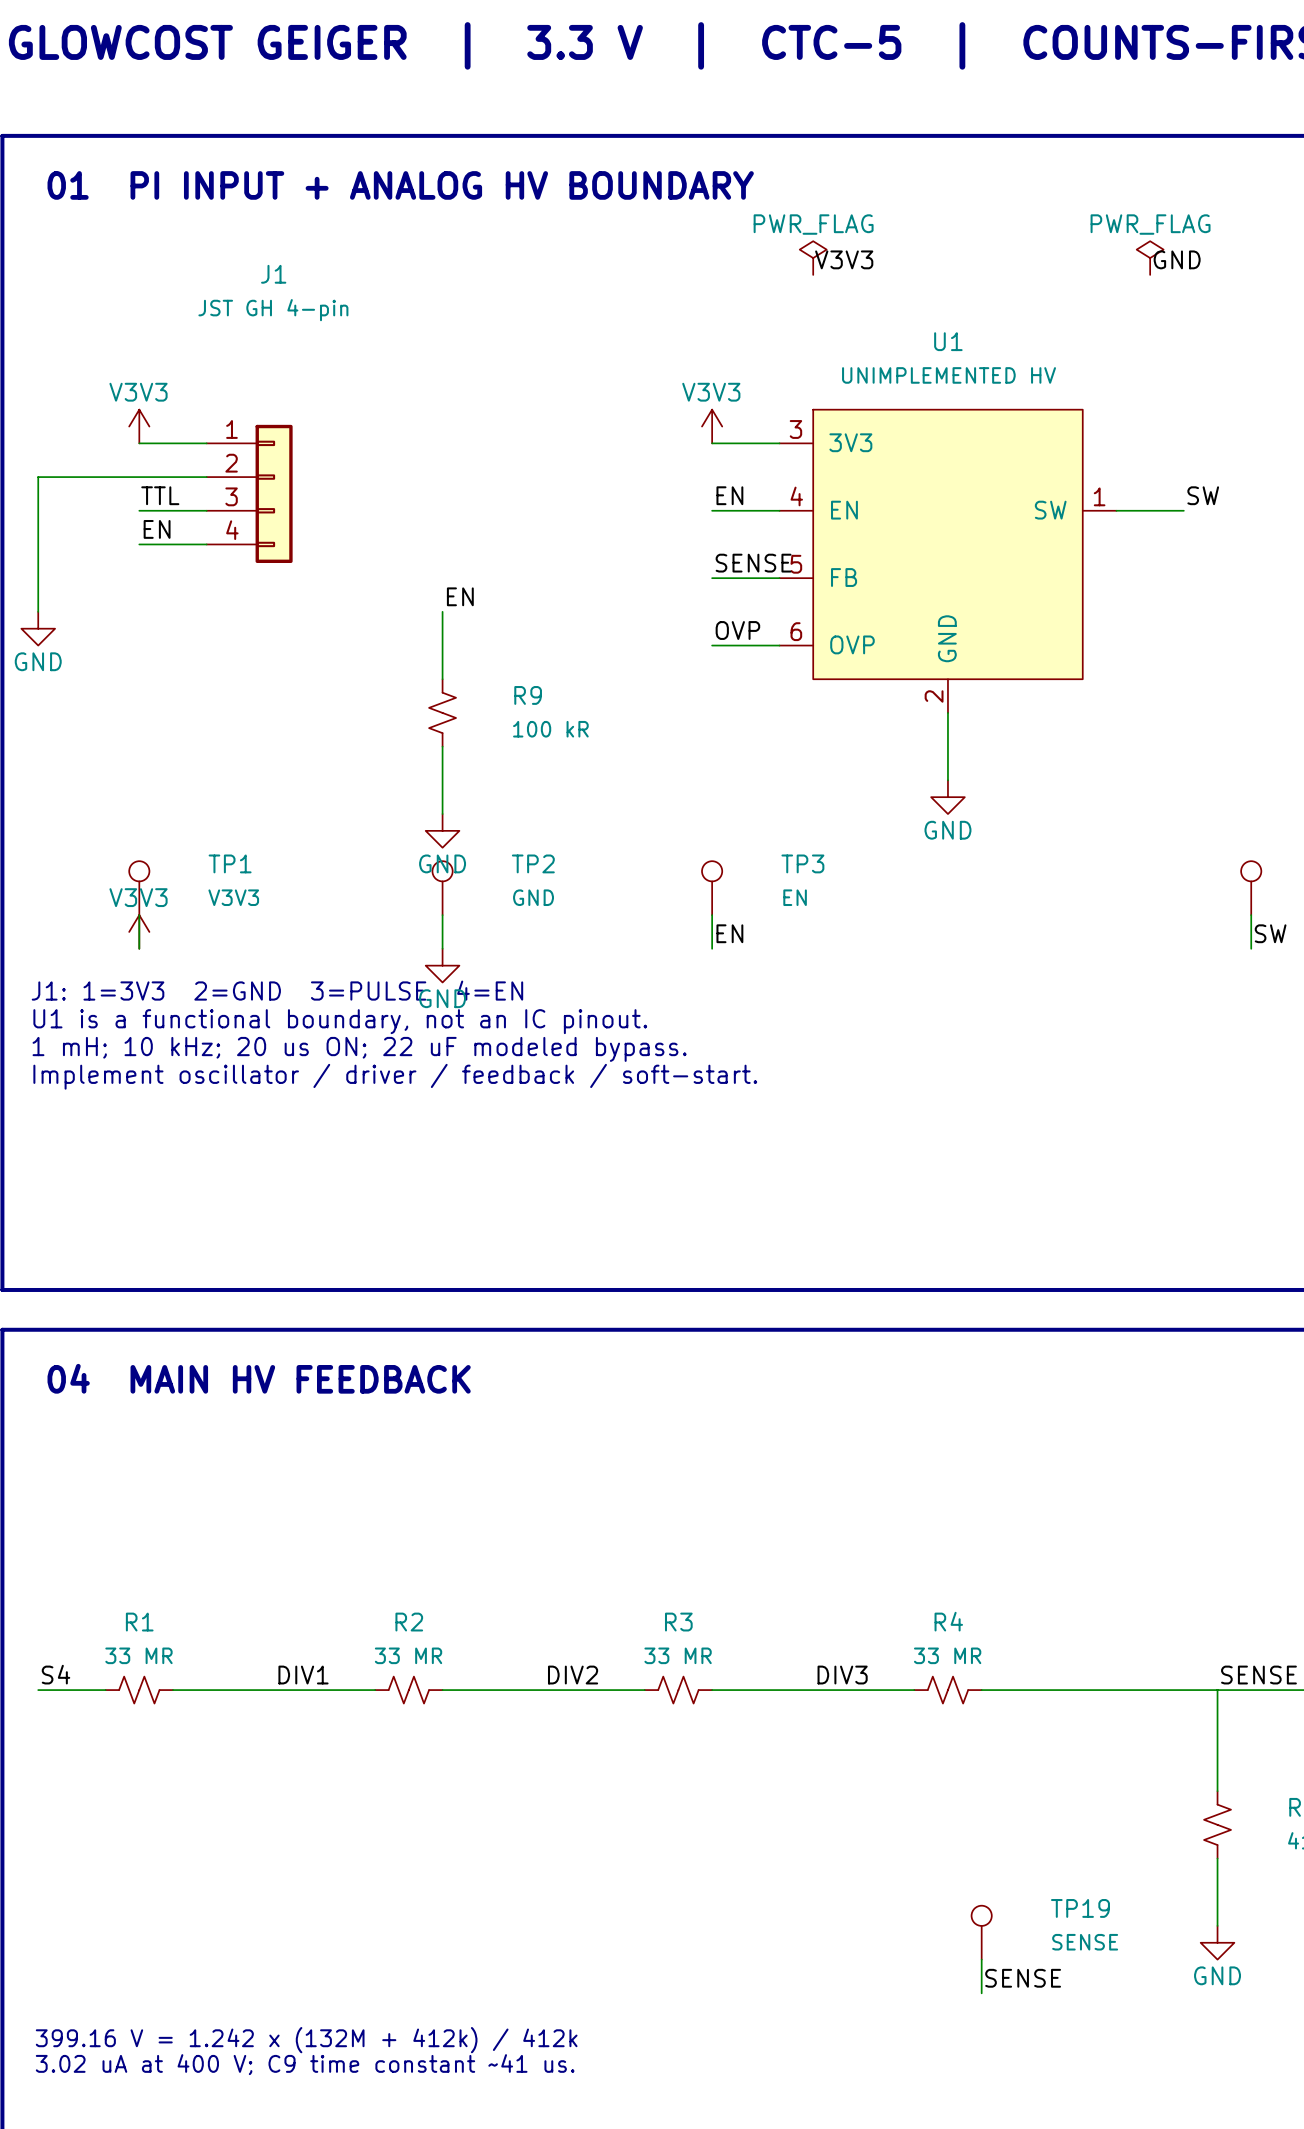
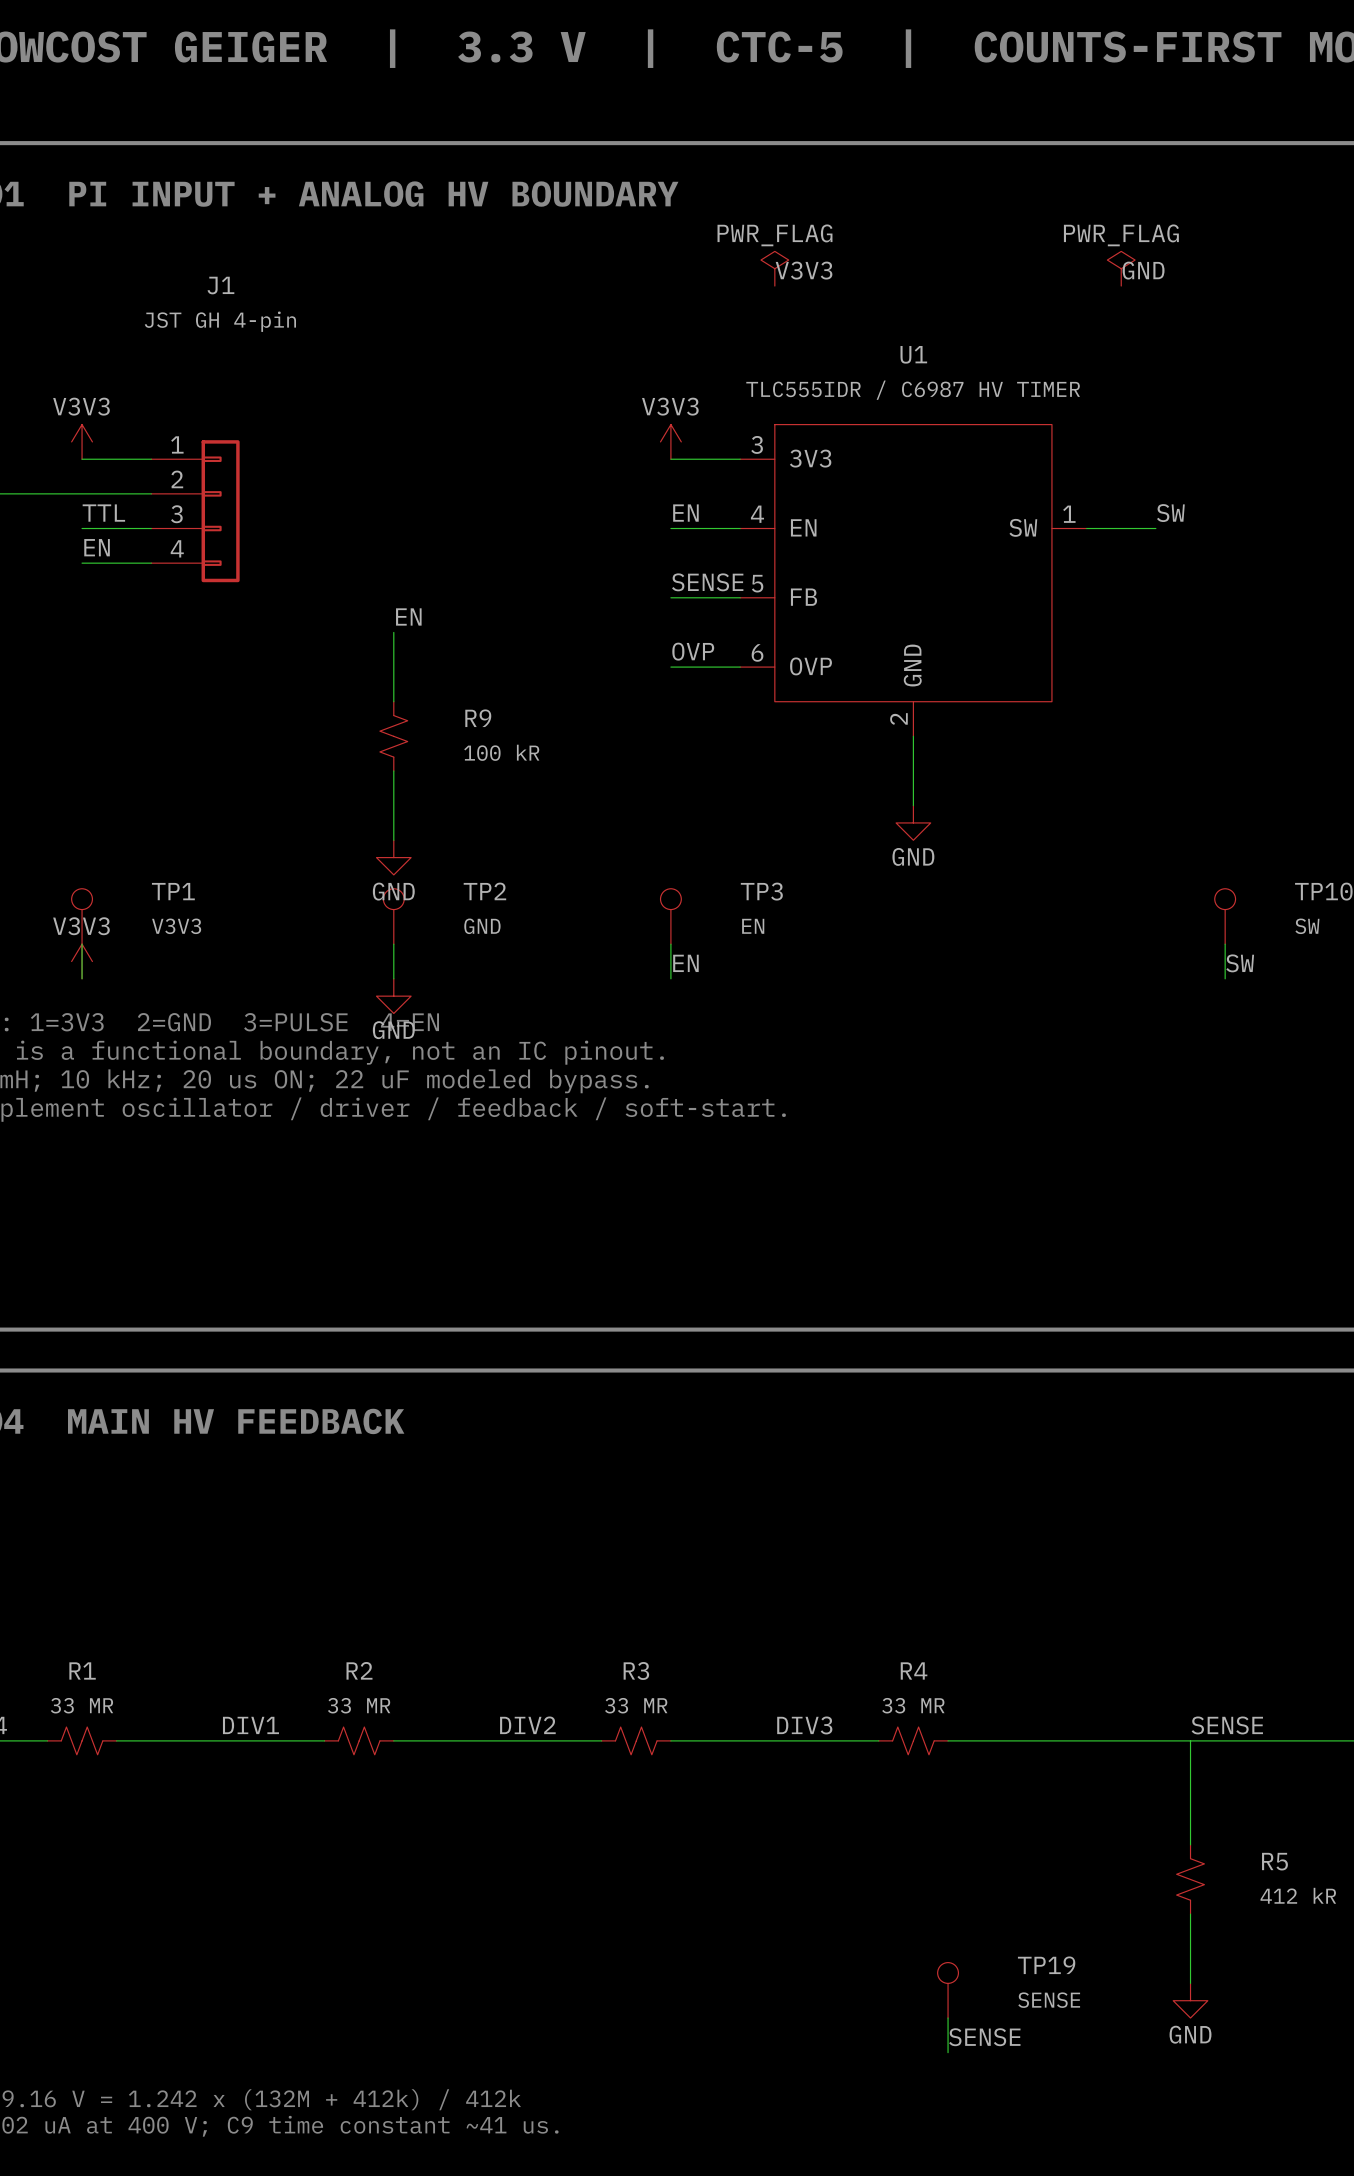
U1 value: UNIMPLEMENTED HV (949, 375) -> TLC555IDR / C6987 HV TIMER (913, 390)

